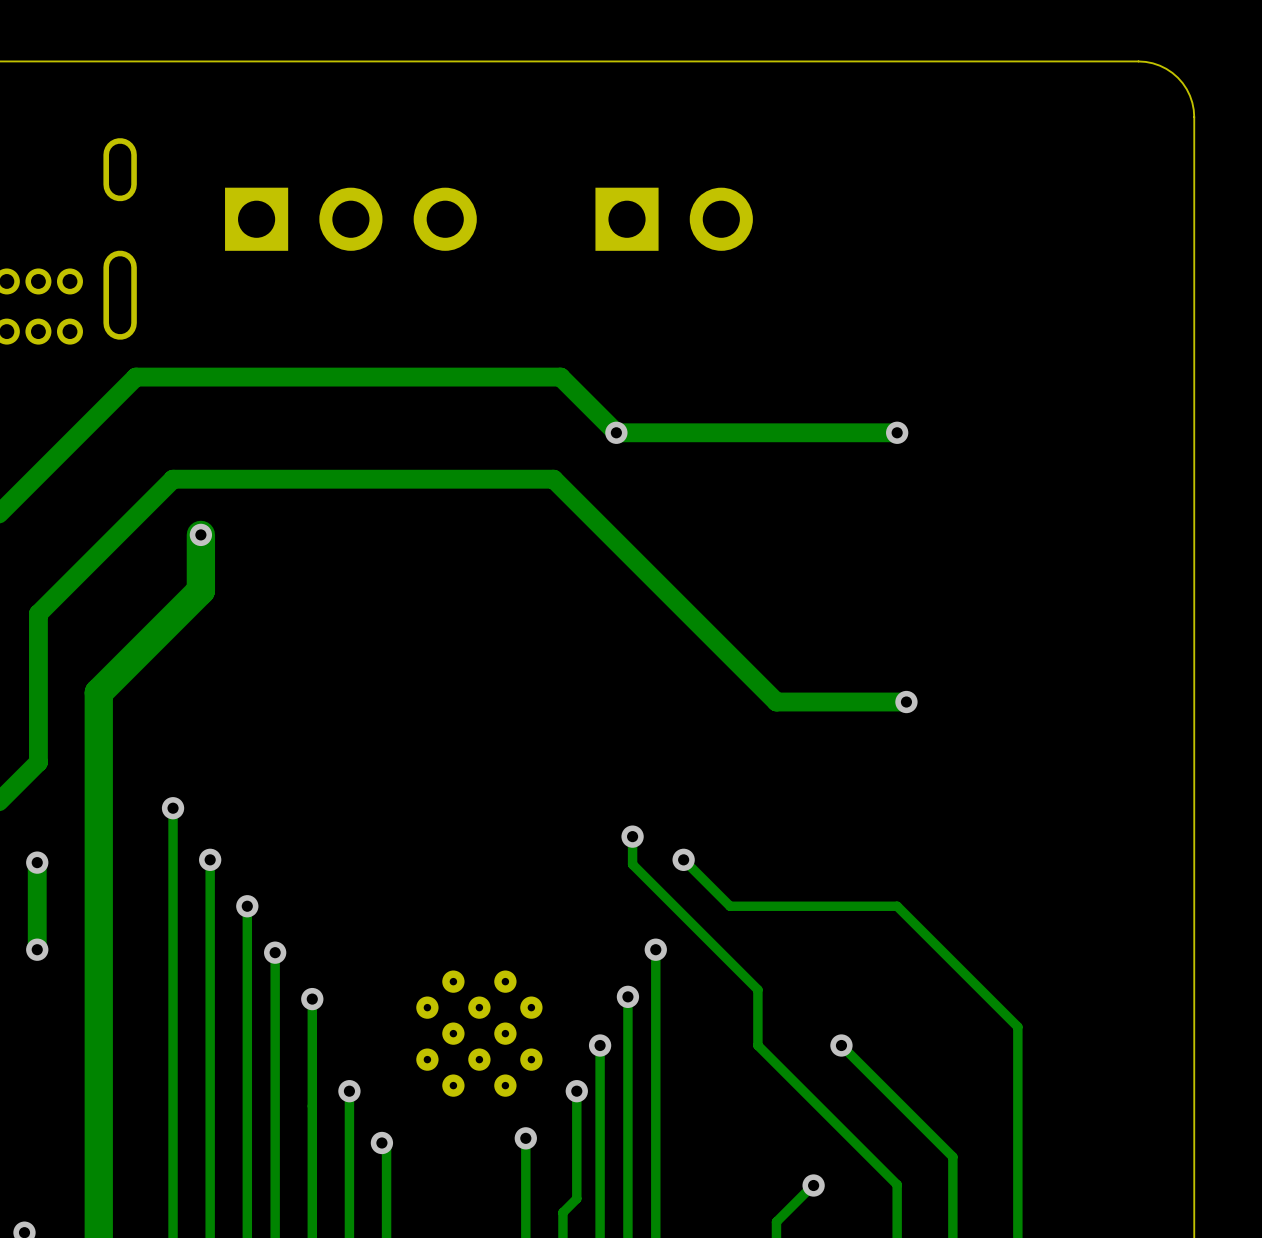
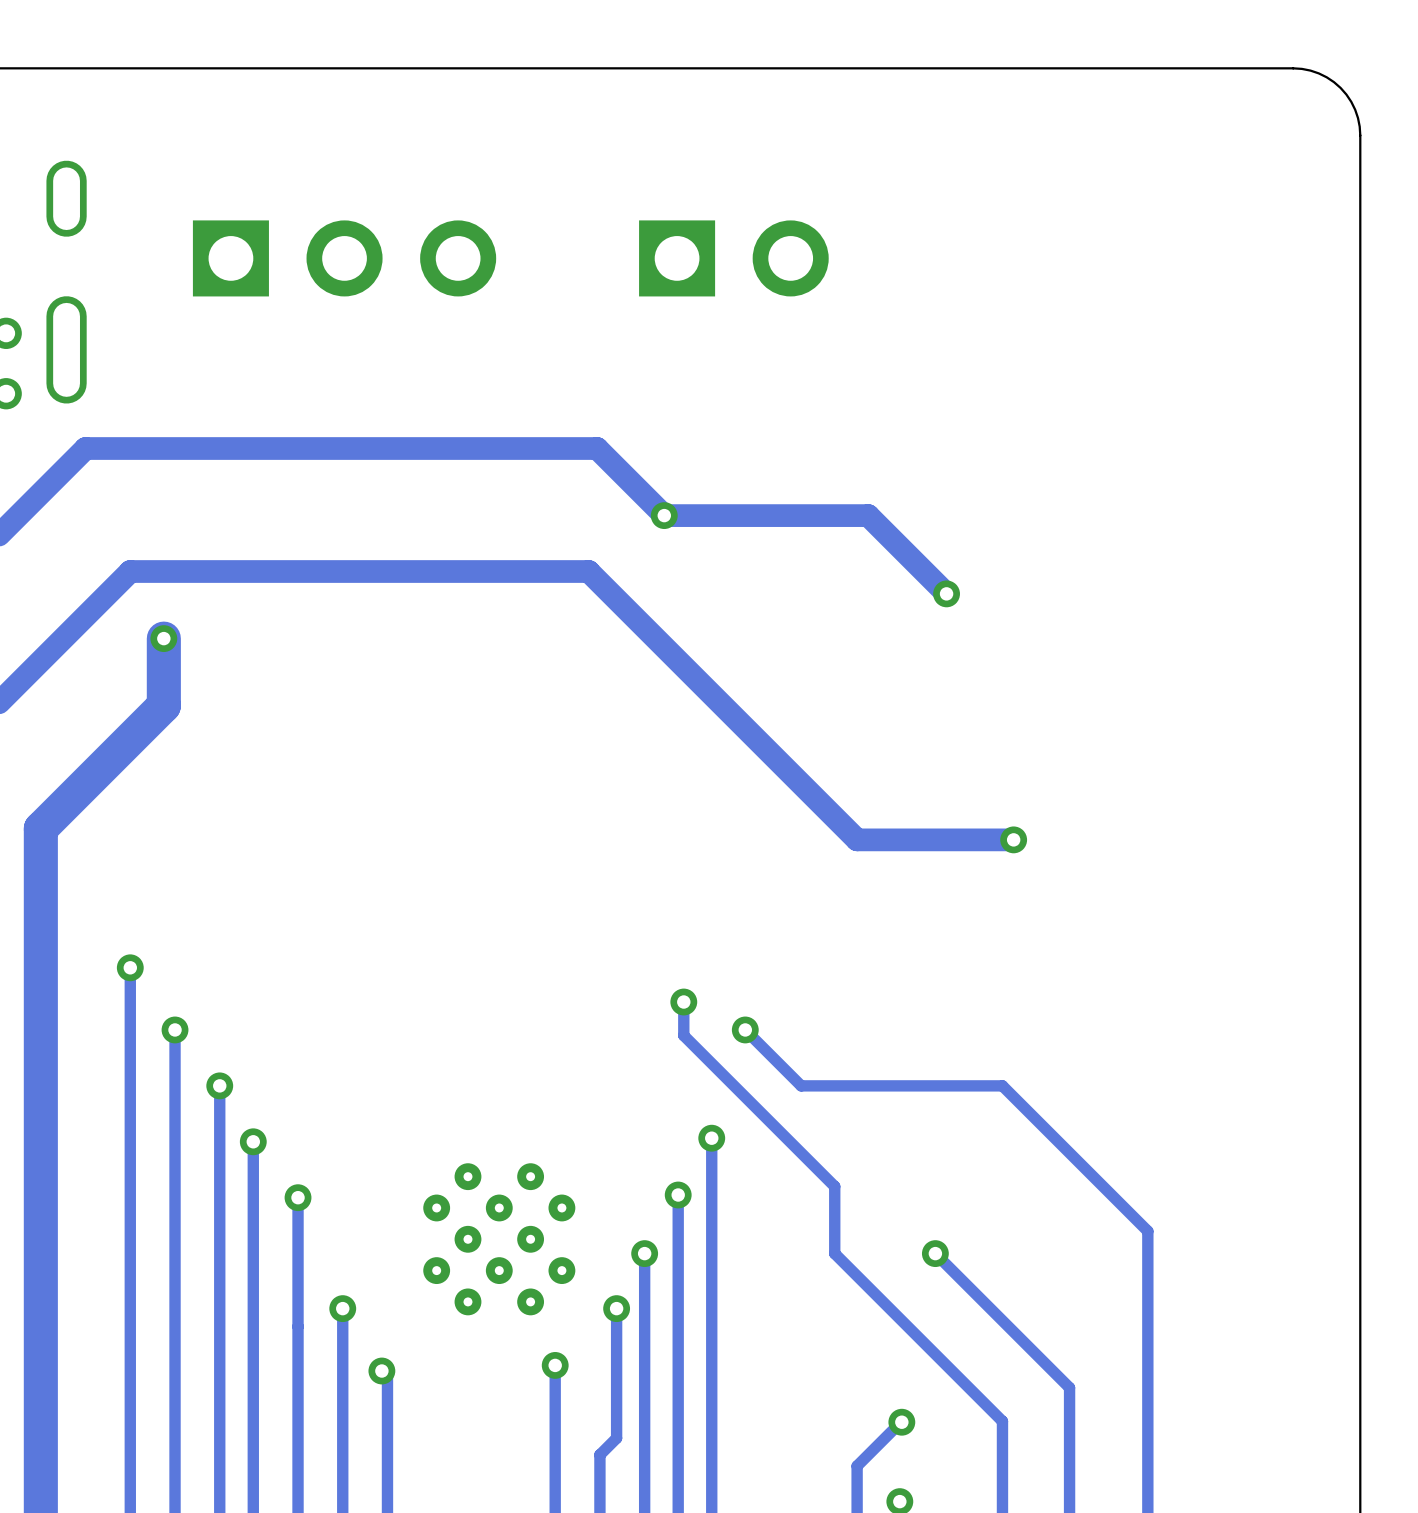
track: (897, 432) (785, 432) -> (946, 593) (868, 515)
via position: (897, 432) -> (946, 593)

